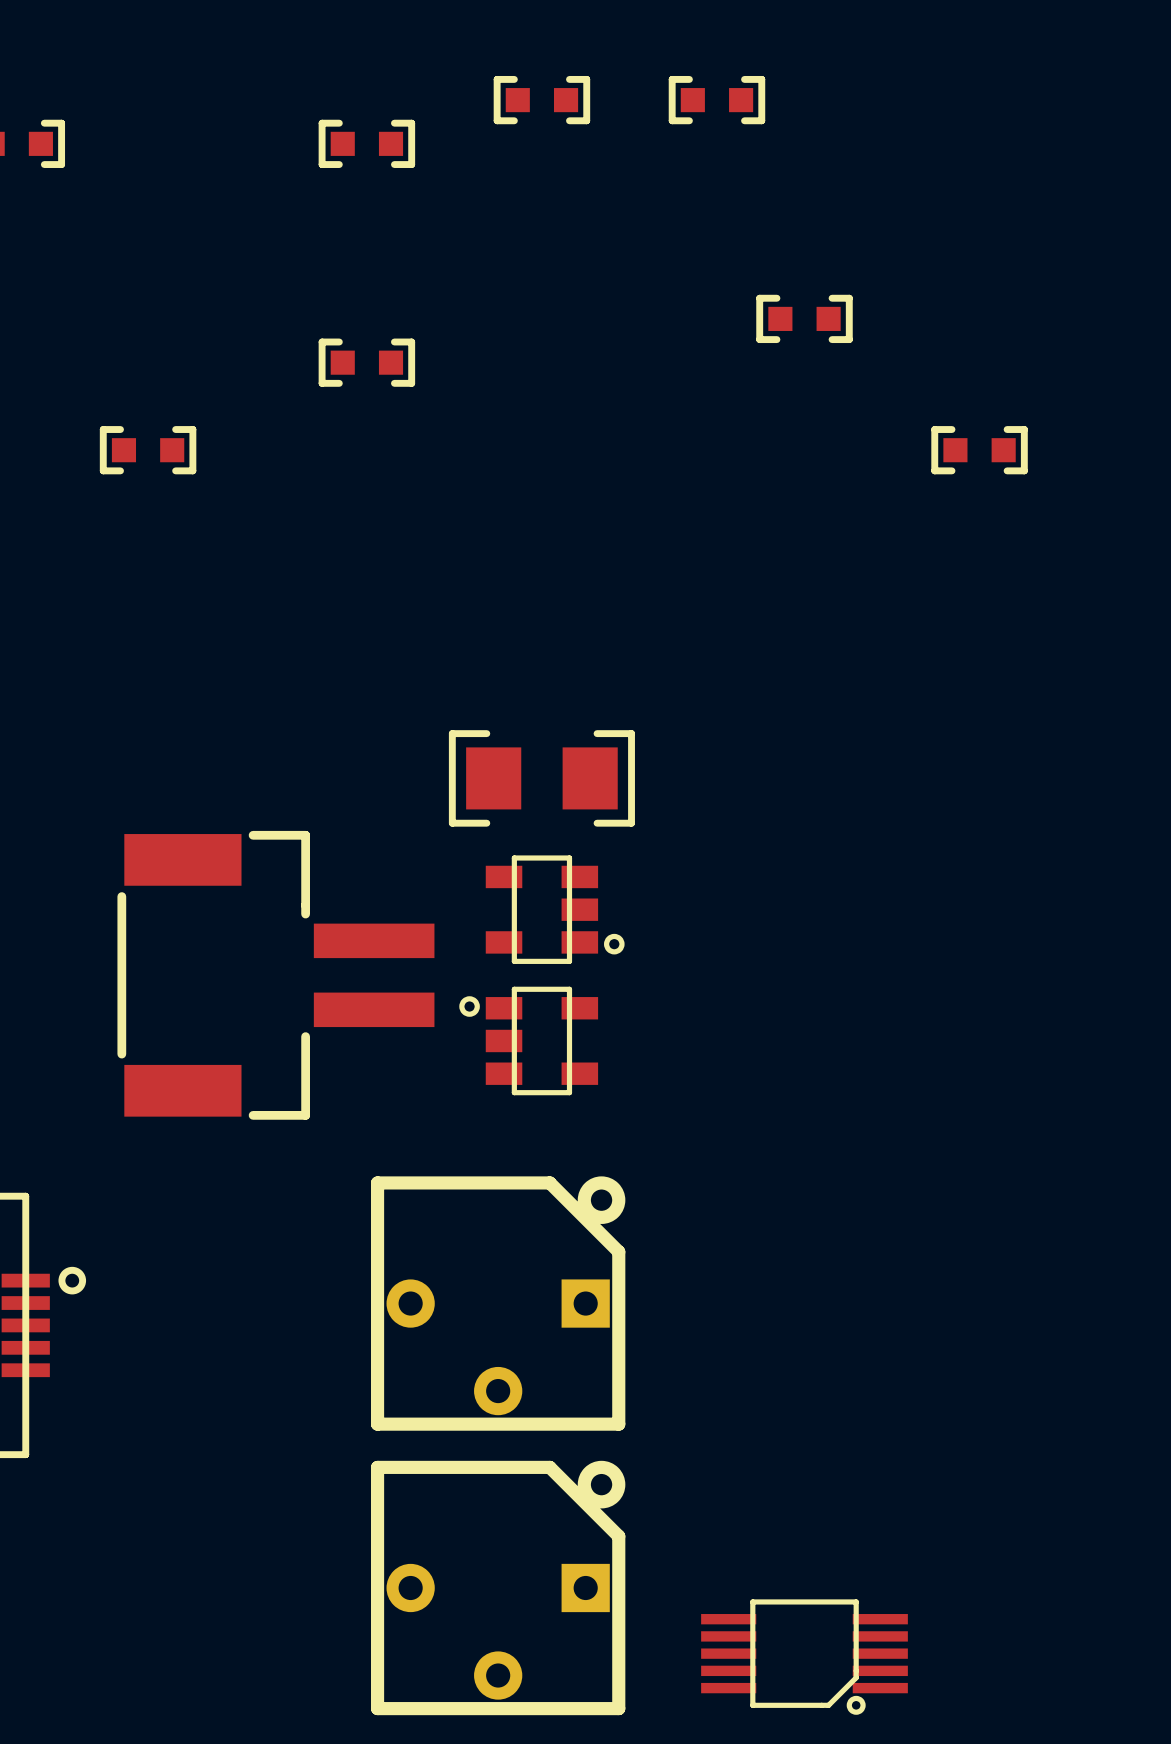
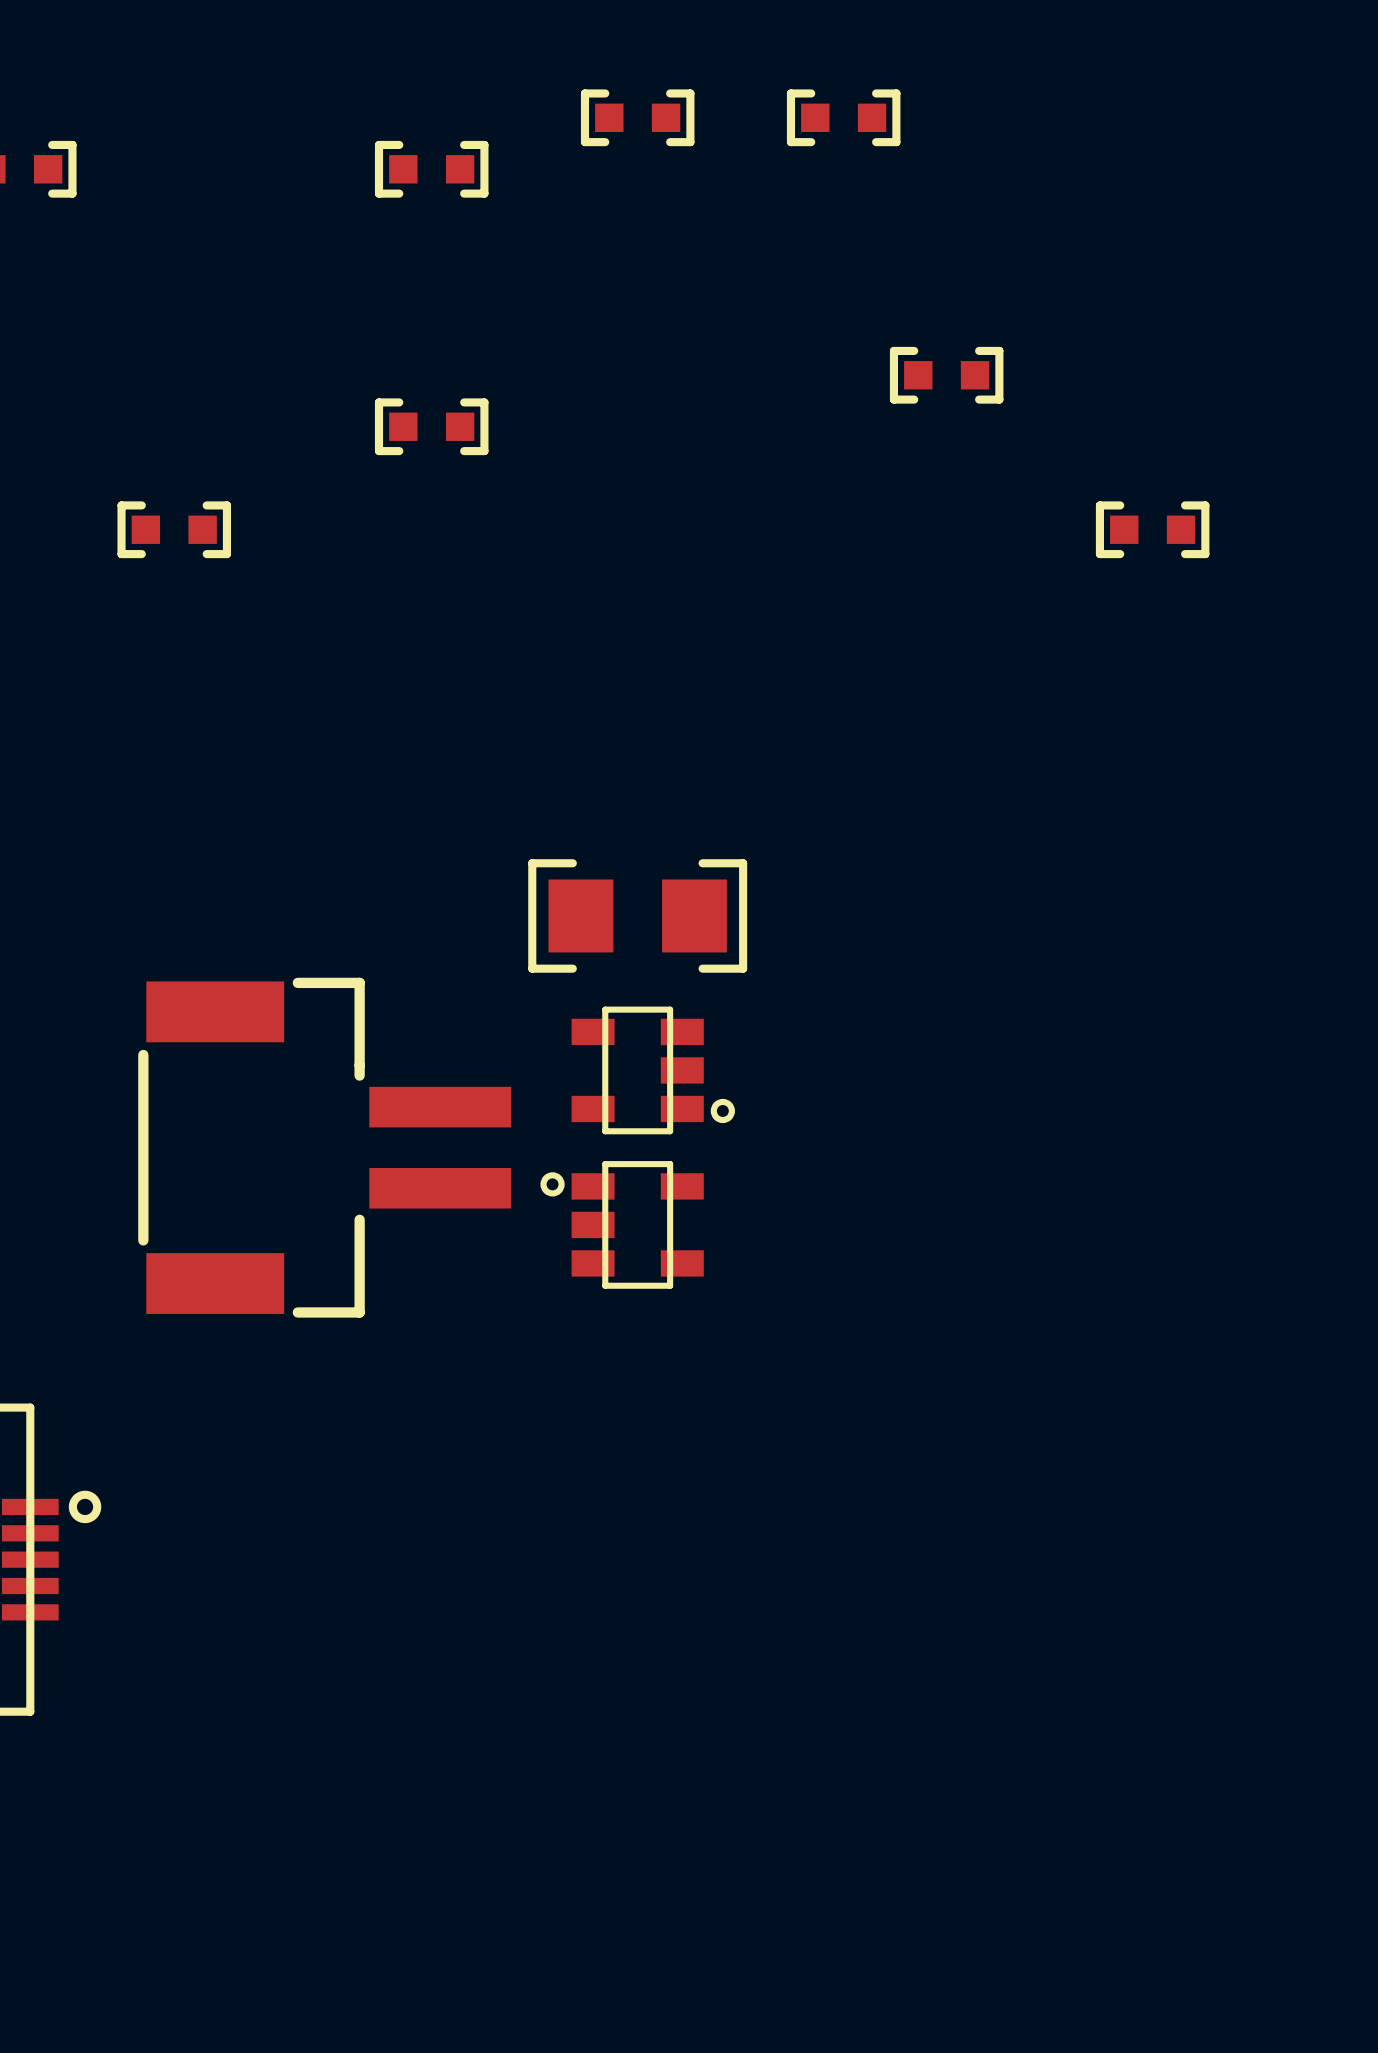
part: (498, 1303) -> none
part: (498, 1588) -> none
part: (804, 1657) -> none

